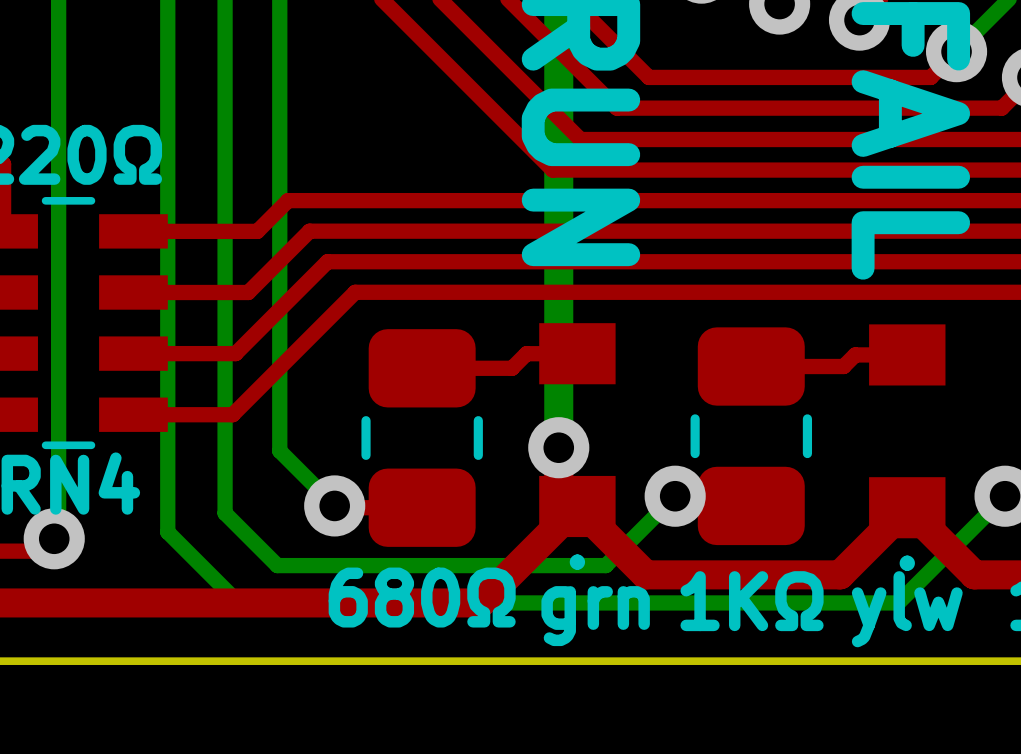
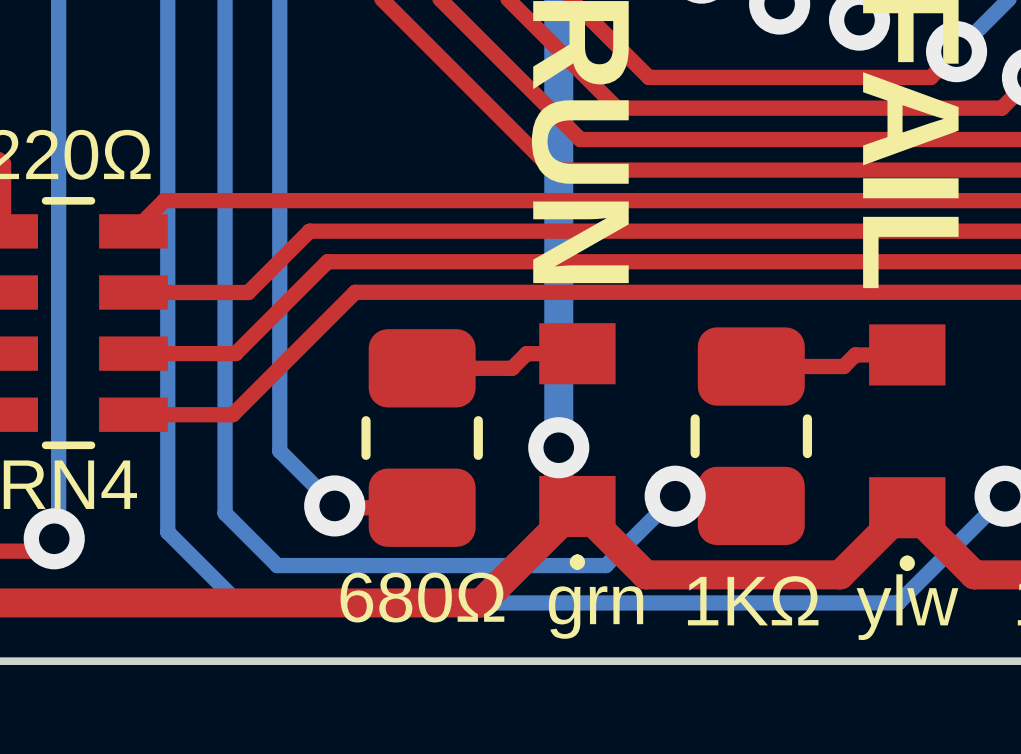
top track: (288, 200) (257, 231) (133, 231) -> (288, 200) (164, 200) (133, 231)

